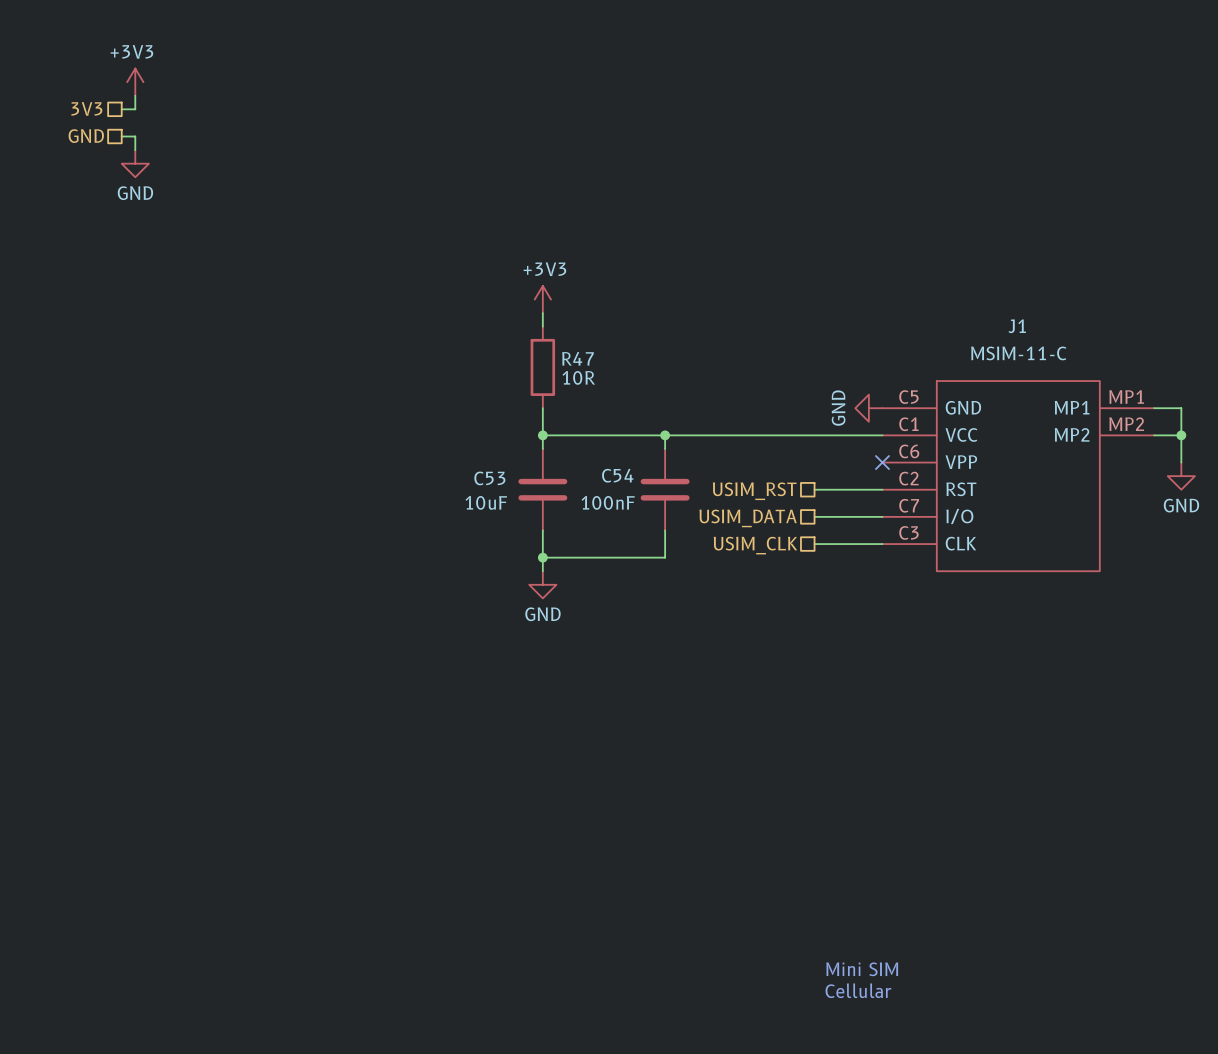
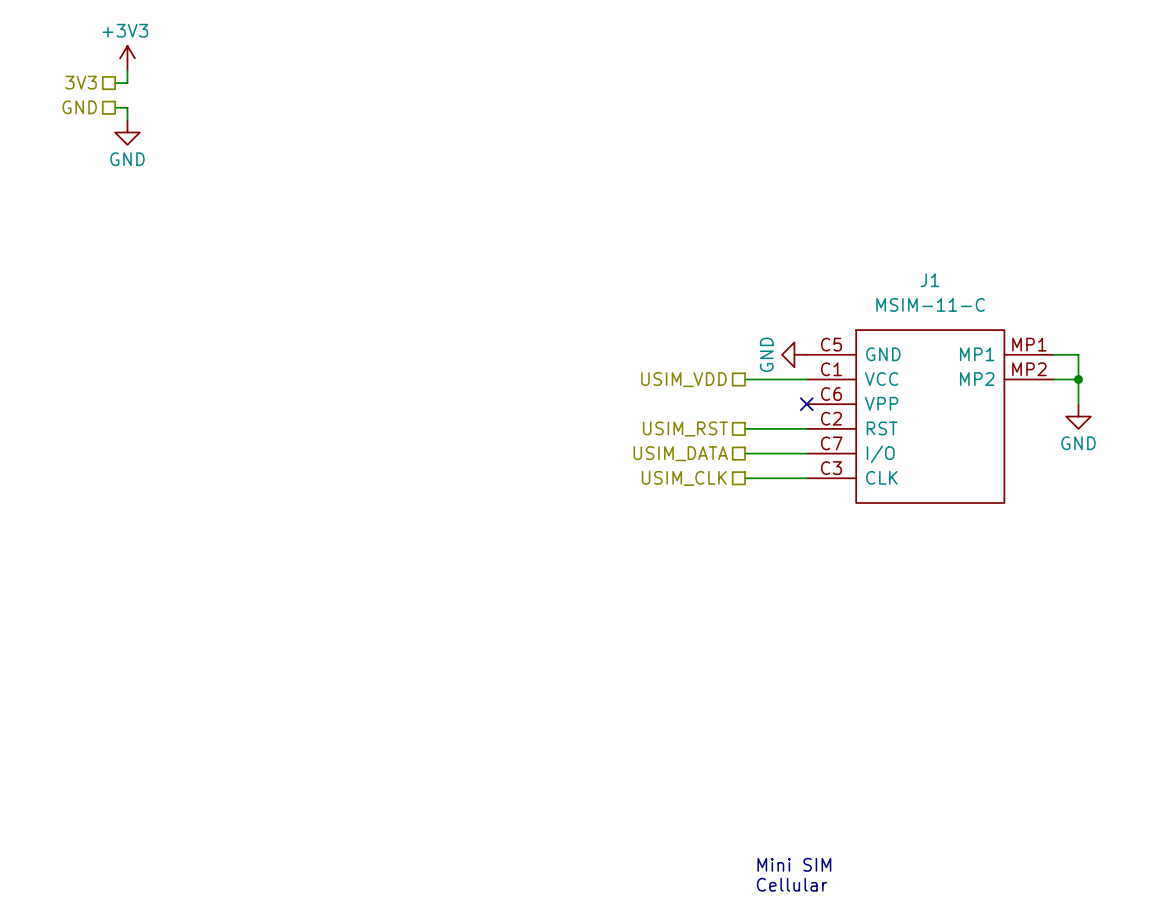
power symbol: +3V3 (542, 299) -> none
wire: (542, 313) (542, 326) -> none
R47: 10R (542, 367) -> none
wire: (542, 408) (542, 448) -> none
wire: (542, 435) (814, 435) -> none
junction: (542, 435) -> none
wire: (665, 435) (665, 448) -> none
junction: (665, 435) -> none
hierarchical label: none -> USIM_VDD (683, 379)
C53: 10uF (542, 489) -> none
C54: 100nF (665, 489) -> none
wire: (542, 530) (542, 571) -> none
wire: (665, 530) (665, 557) (542, 557) -> none
junction: (542, 557) -> none
power symbol: GND (542, 584) -> none

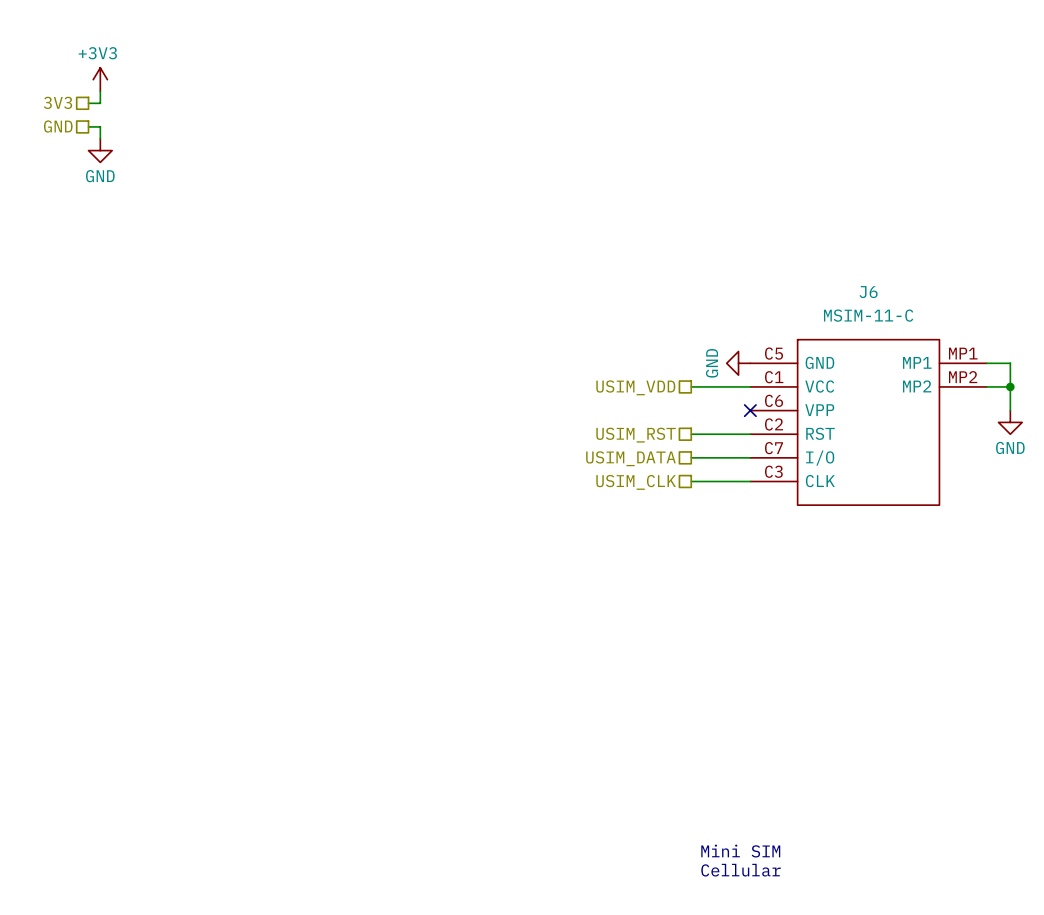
J1 name: J1 (929, 280) -> J6 (868, 292)

